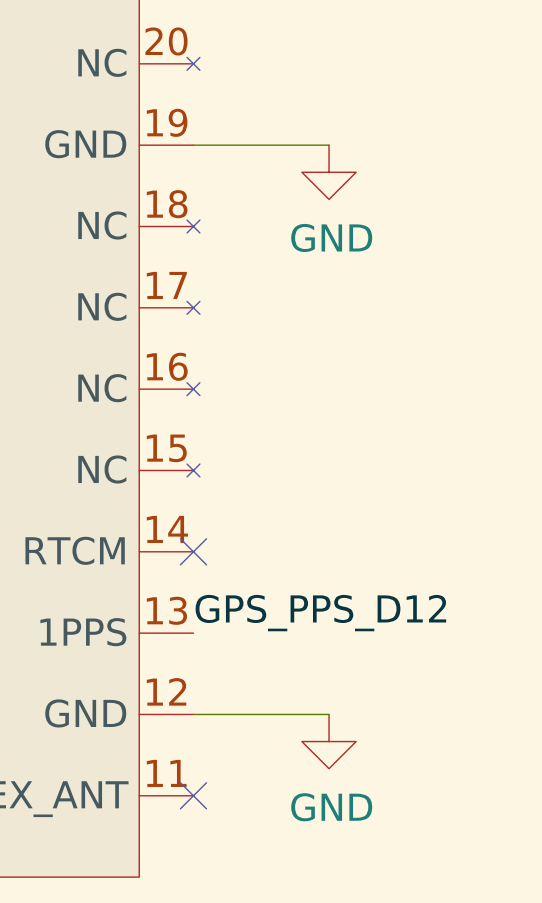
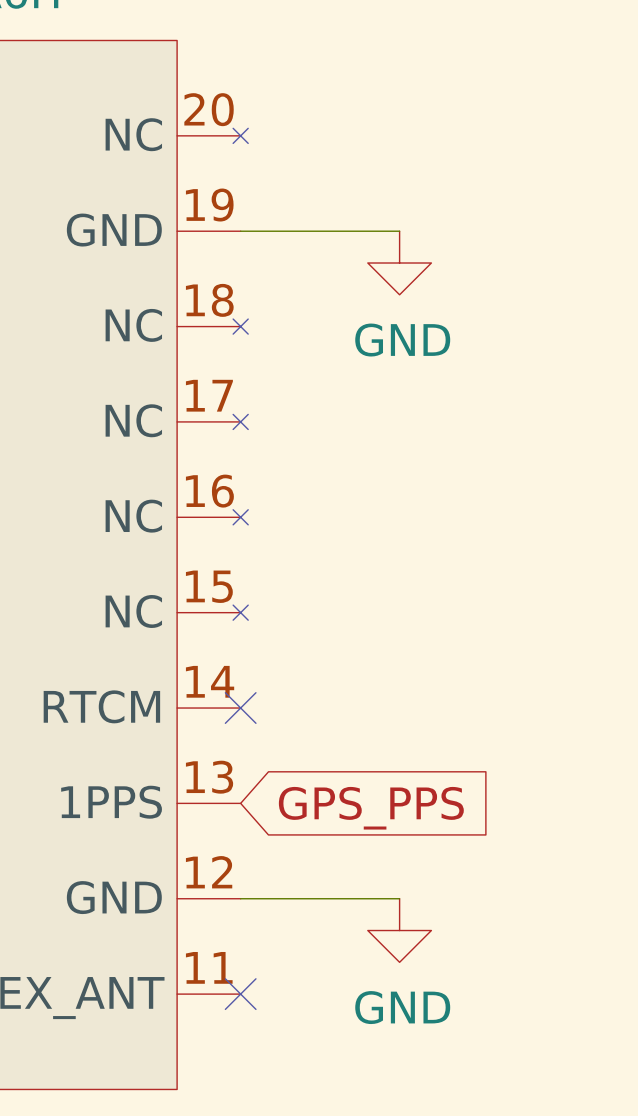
label: GPS_PPS_D12 (320, 613) -> none
global label: none -> GPS_PPS (371, 808)

